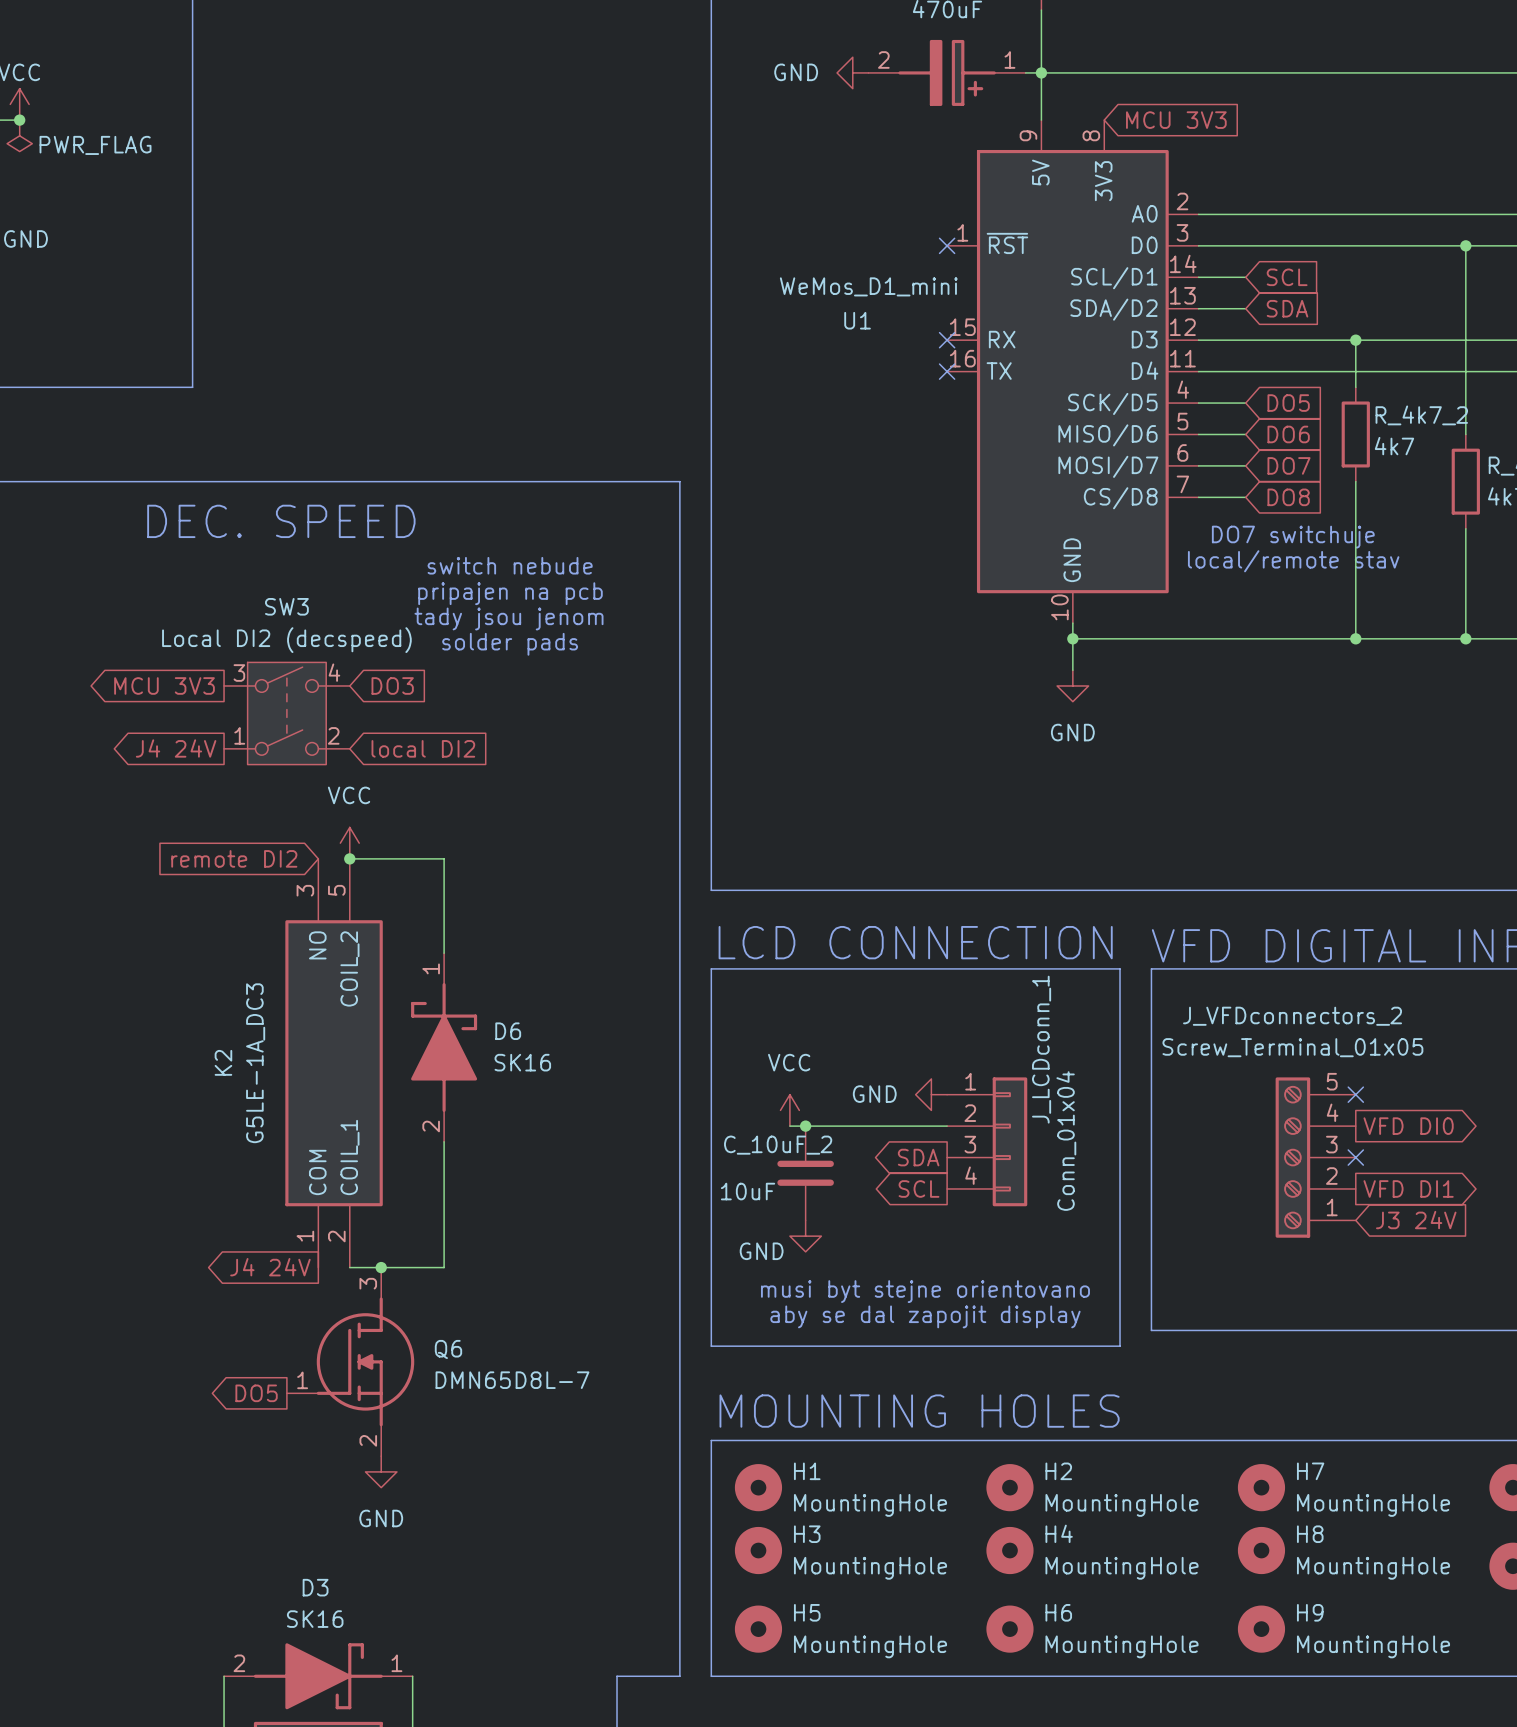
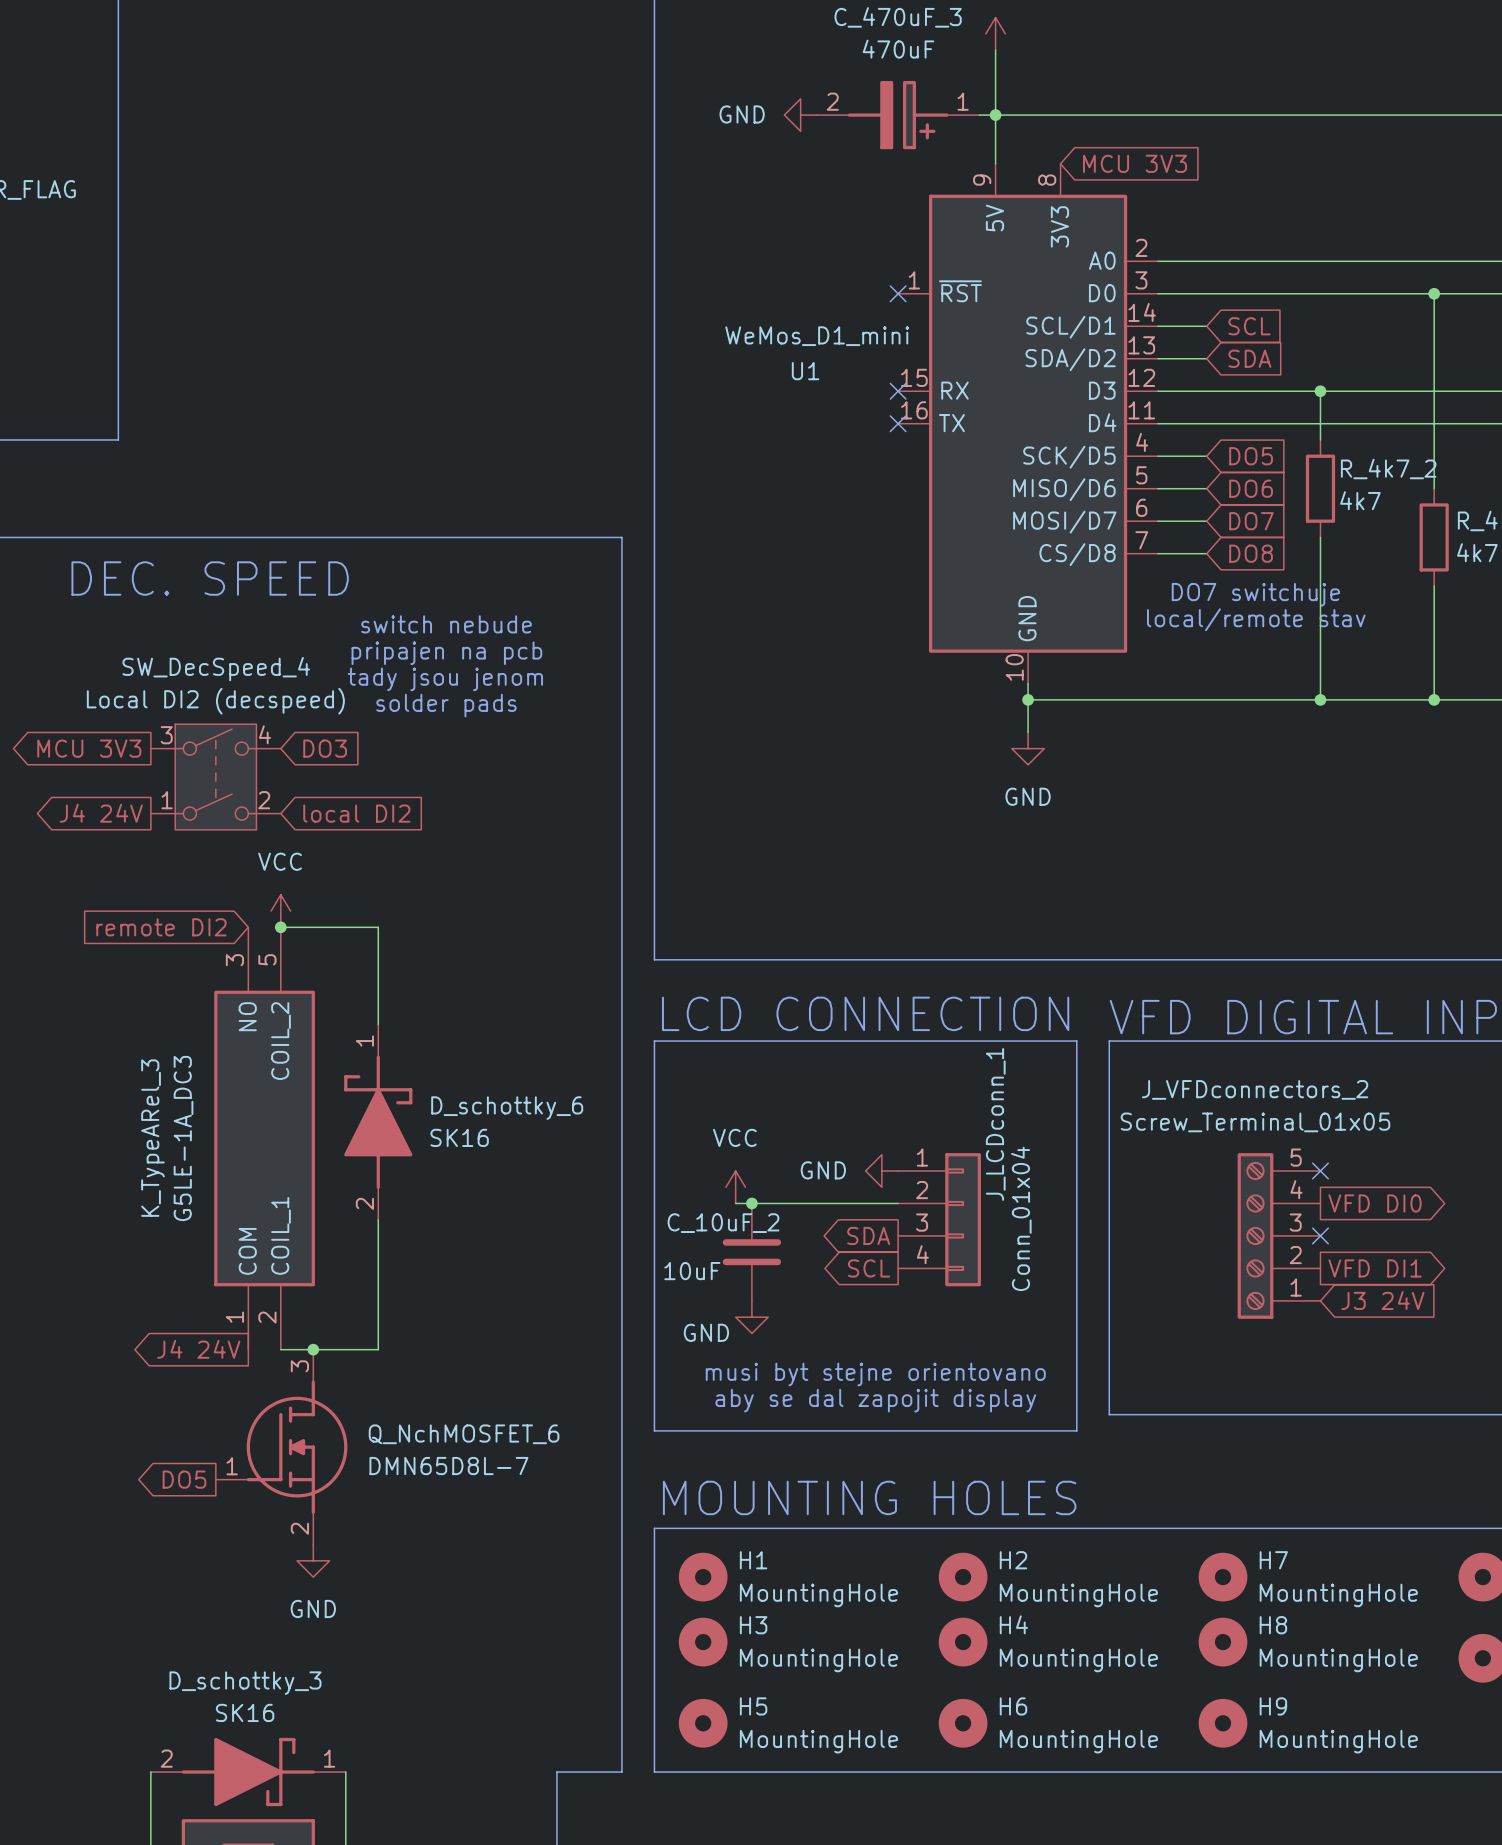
SW3 name: SW3 (286, 606) -> SW_DecSpeed_4 (216, 669)
D6 name: D6 (508, 1031) -> D_schottky_6 (507, 1108)
K2 name: K2 (223, 1062) -> K_TypeARel_3 (152, 1138)
Q6 name: Q6 (448, 1349) -> Q_NchMOSFET_6 (464, 1434)
D3 name: D3 (315, 1587) -> D_schottky_3 (245, 1683)

